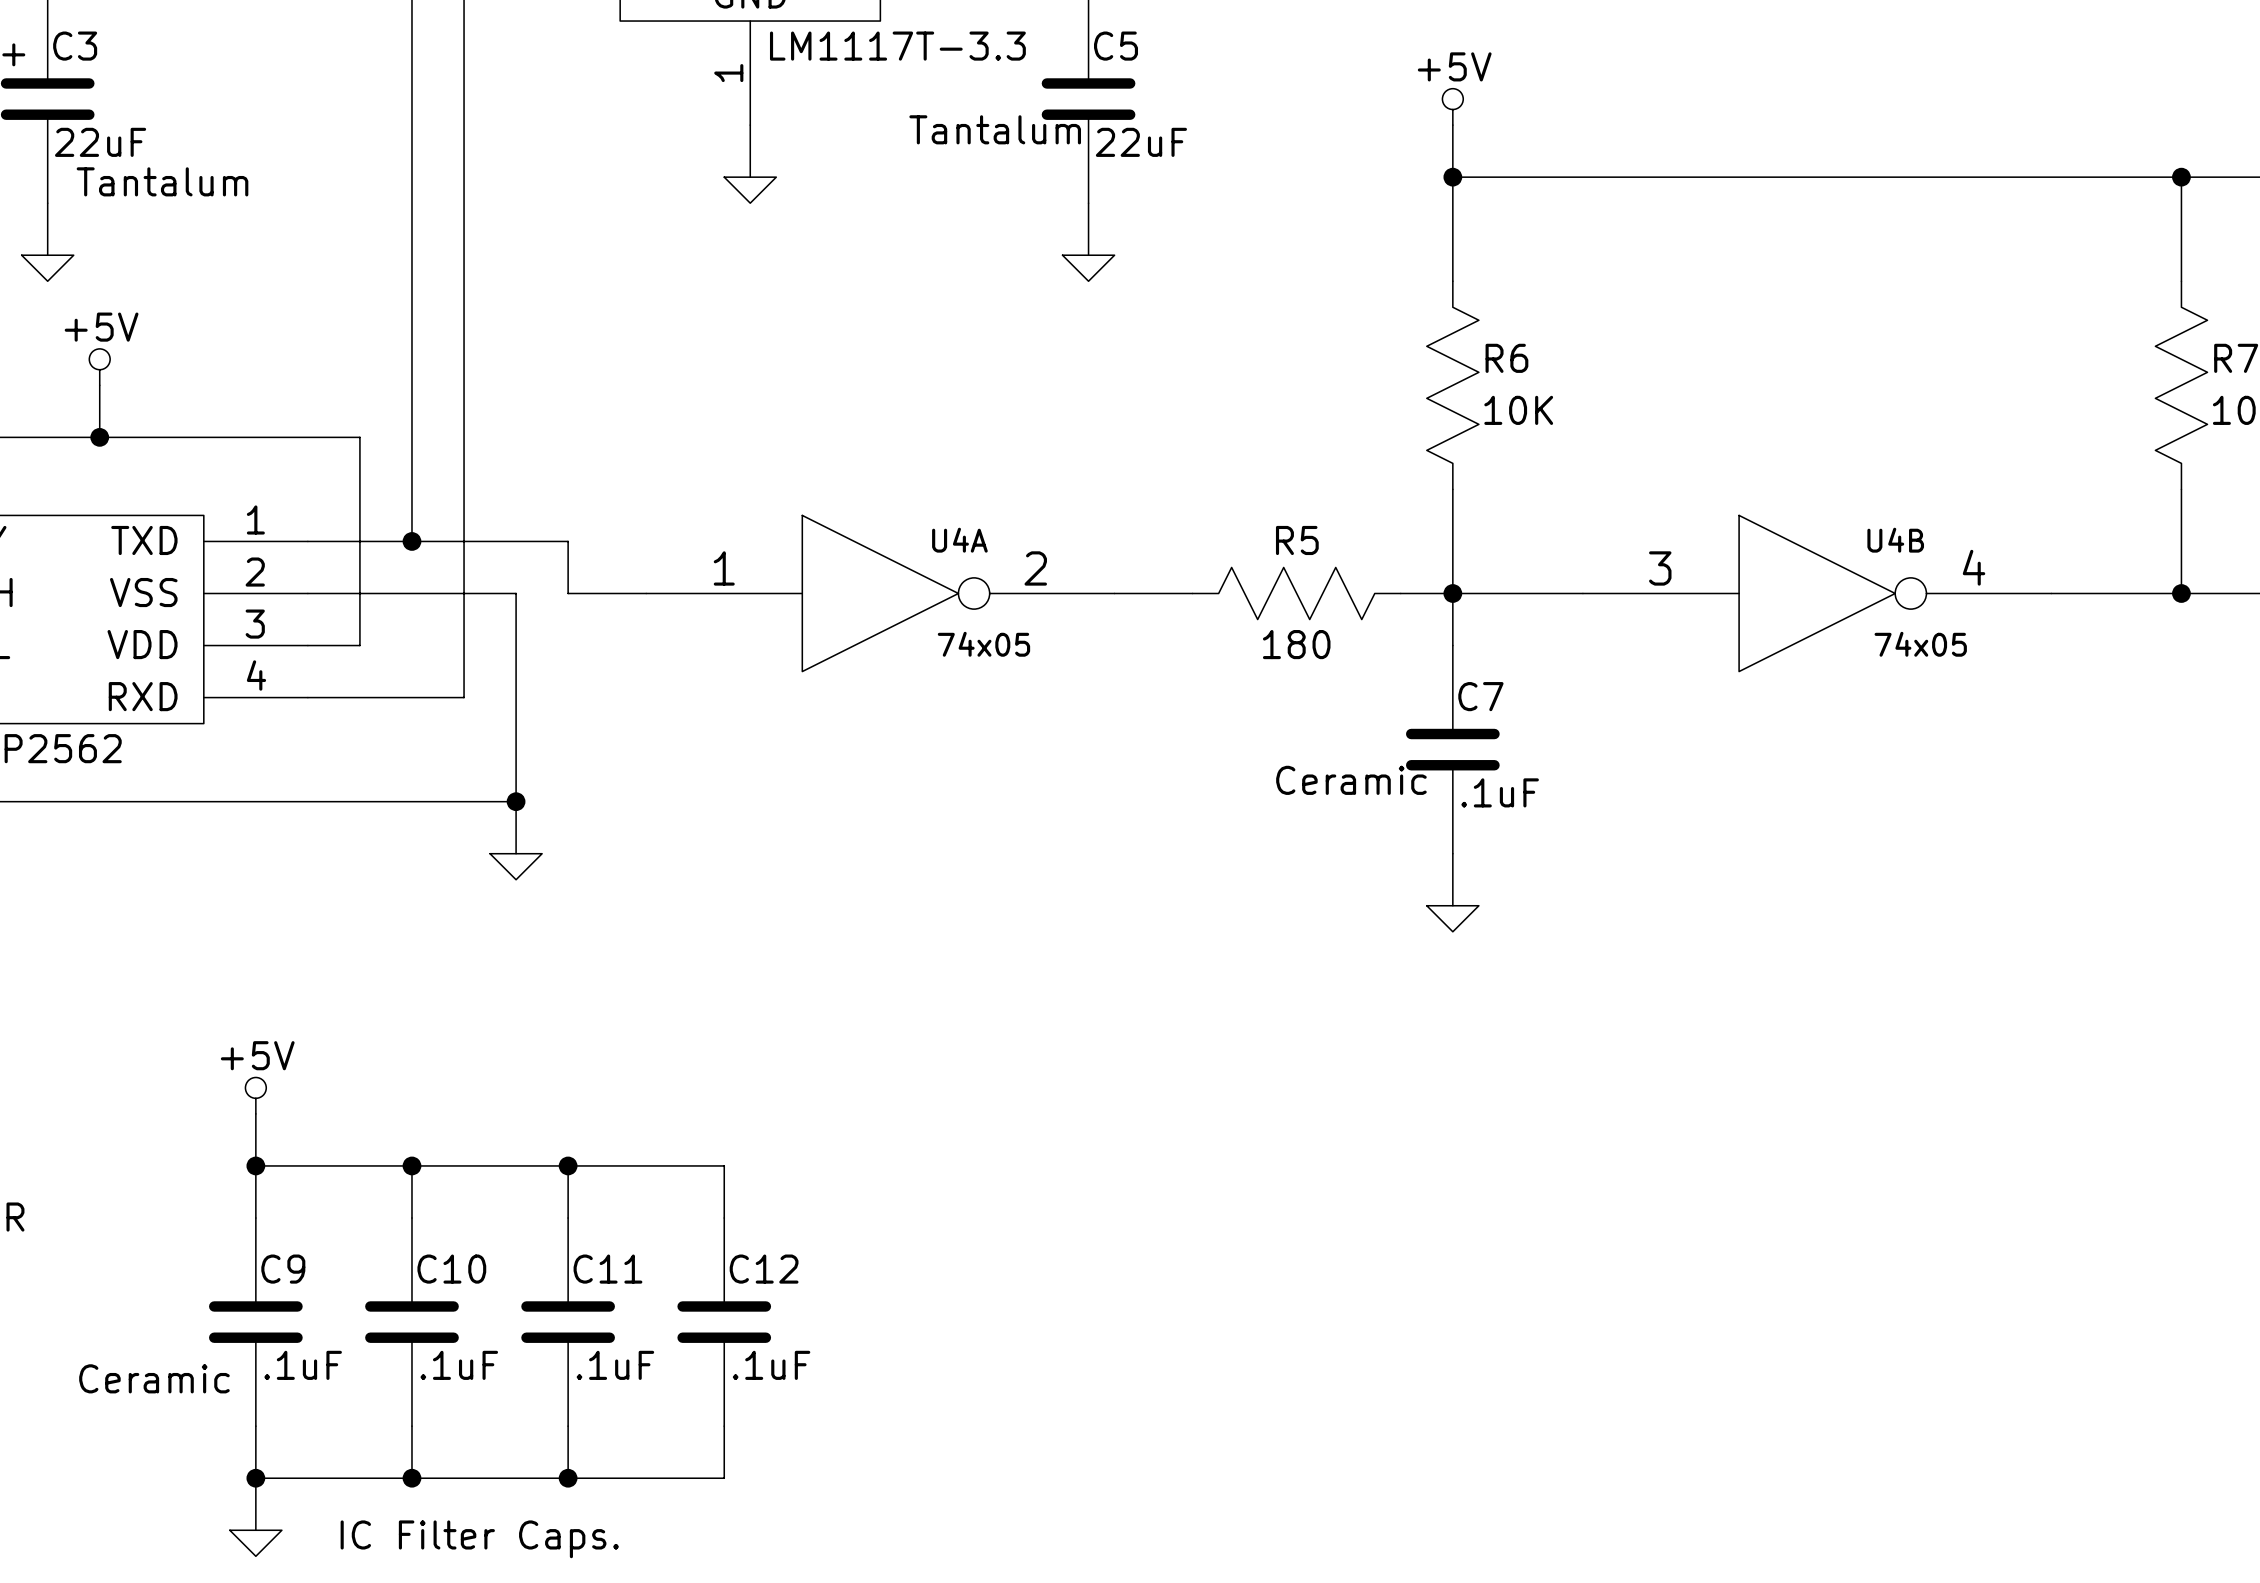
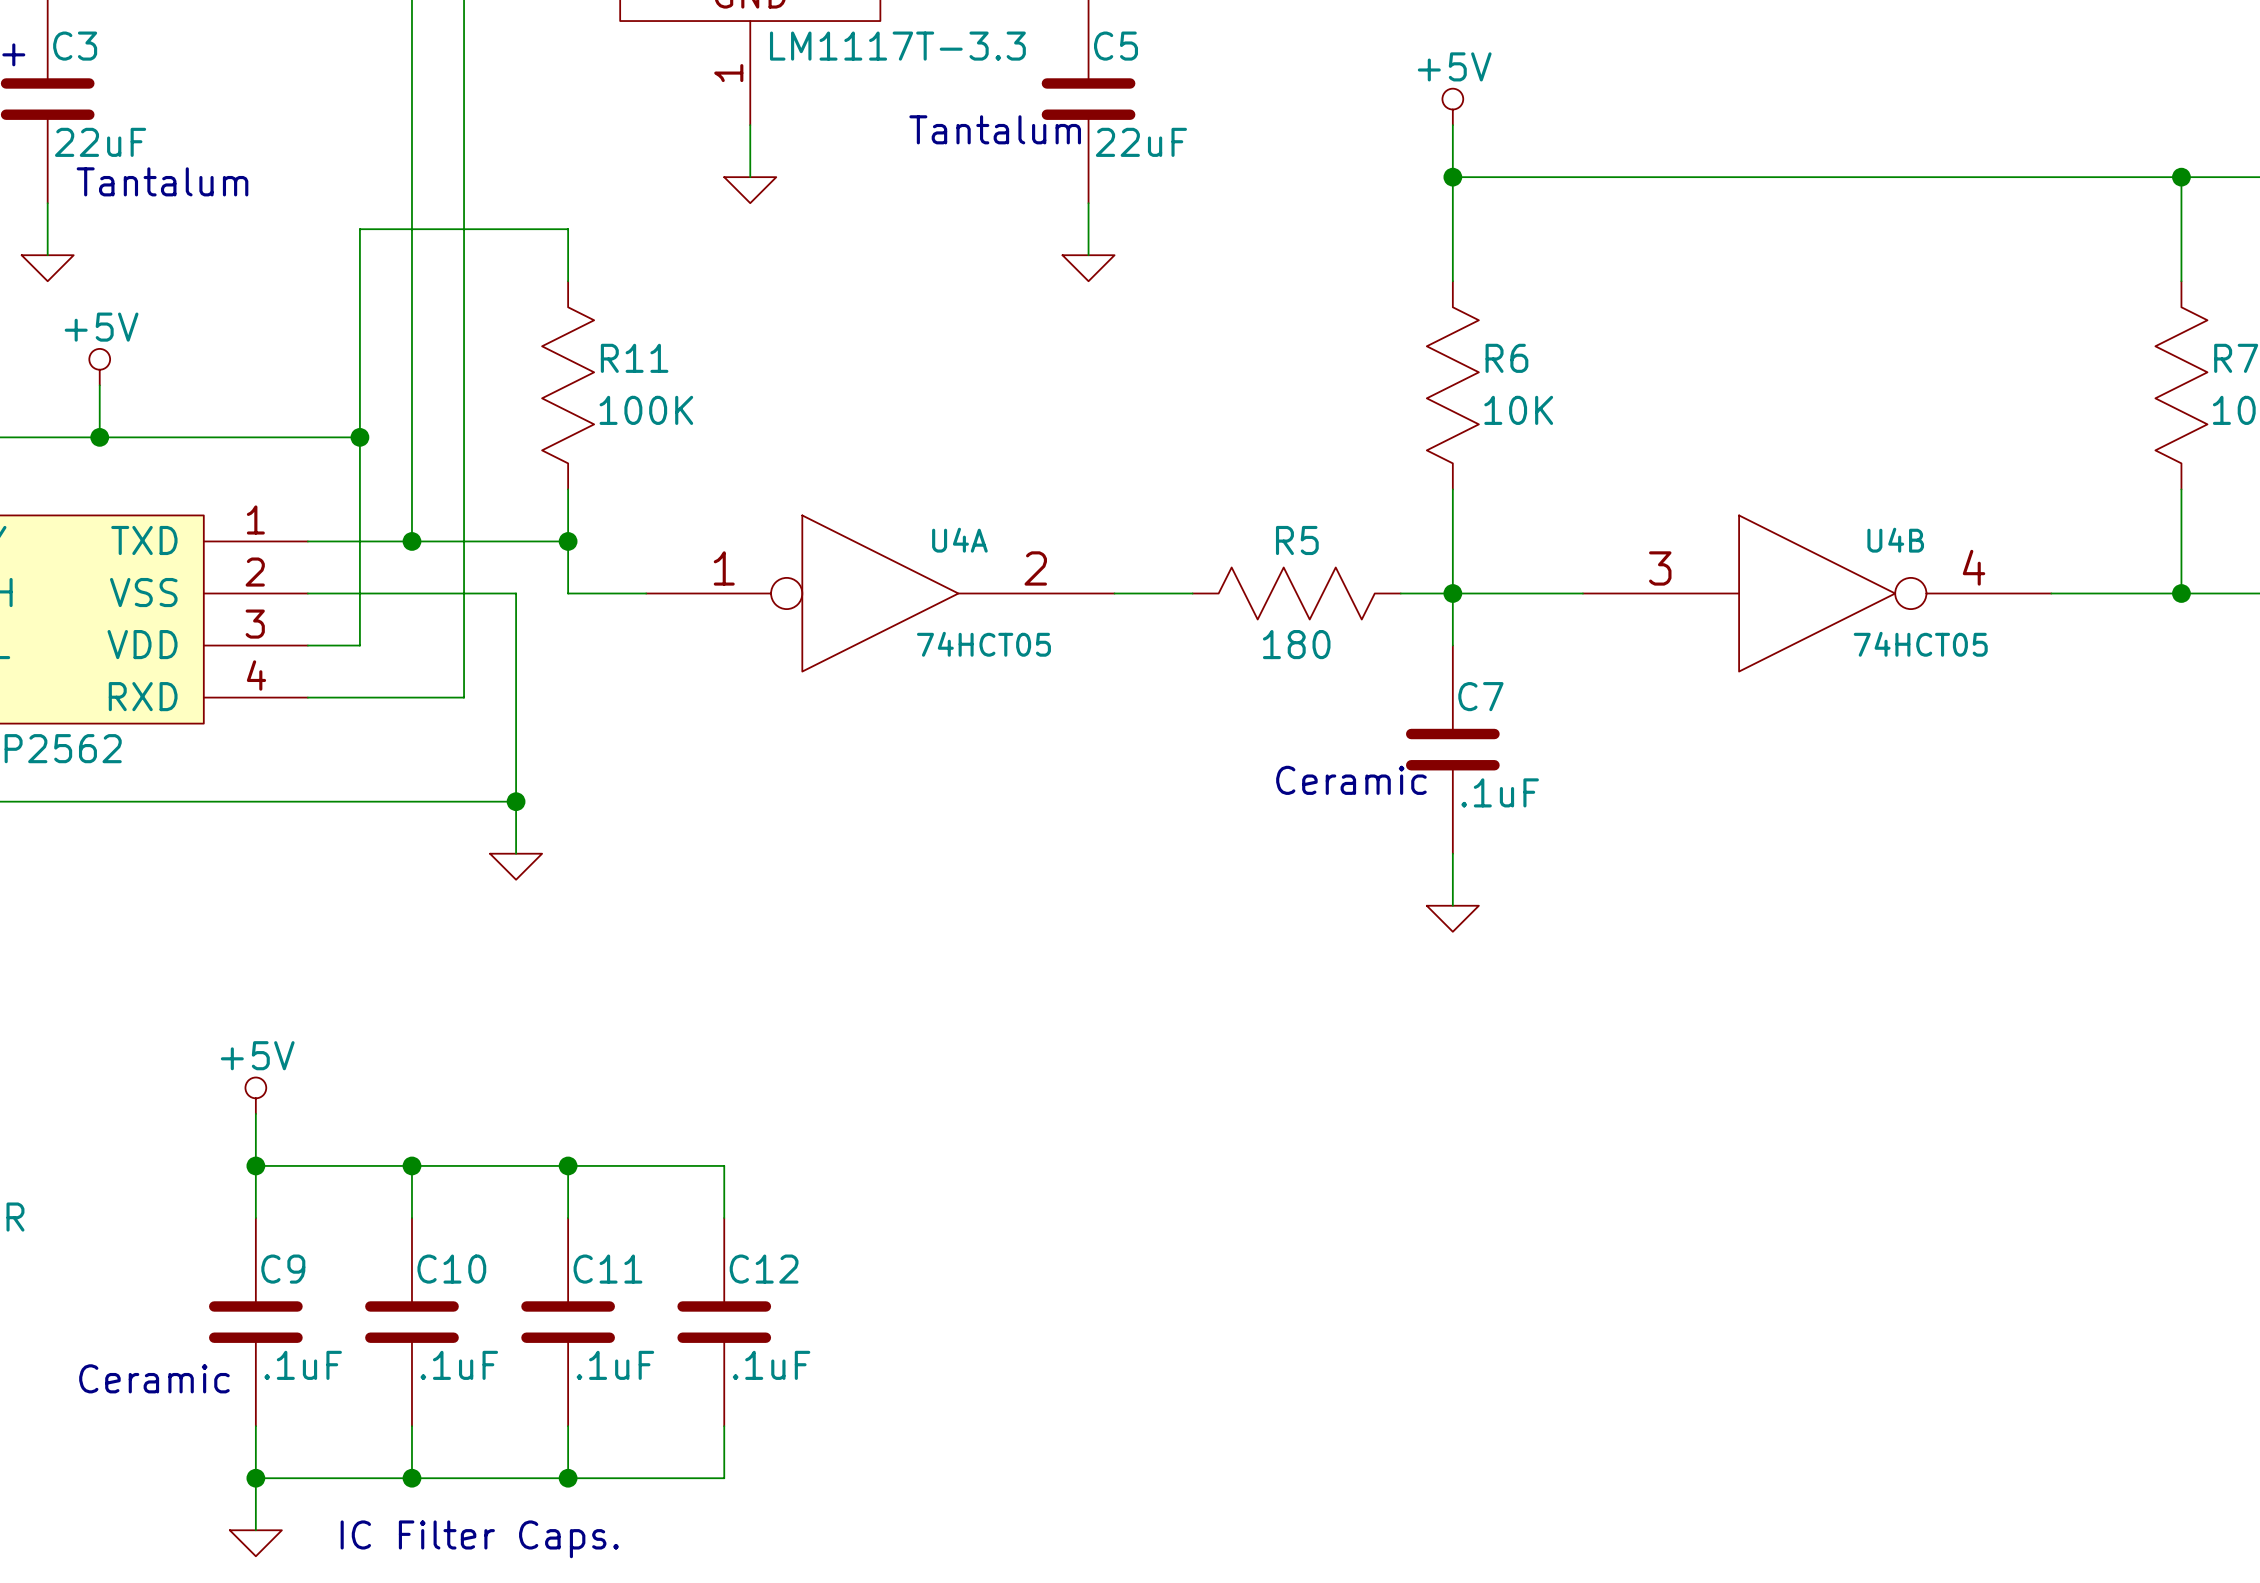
wire: none -> (568, 281) (568, 229) (359, 229) (359, 437)
R11: none -> 100K (568, 385)
junction: none -> (359, 437)
wire: none -> (568, 489) (568, 541)
U4A symbol: [646, 515, 1115, 672] -> [646, 515, 1115, 672]
junction: none -> (568, 541)
U4A value: 74x05 (983, 644) -> 74HCT05 (983, 644)
U4B value: 74x05 (1920, 644) -> 74HCT05 (1920, 644)

